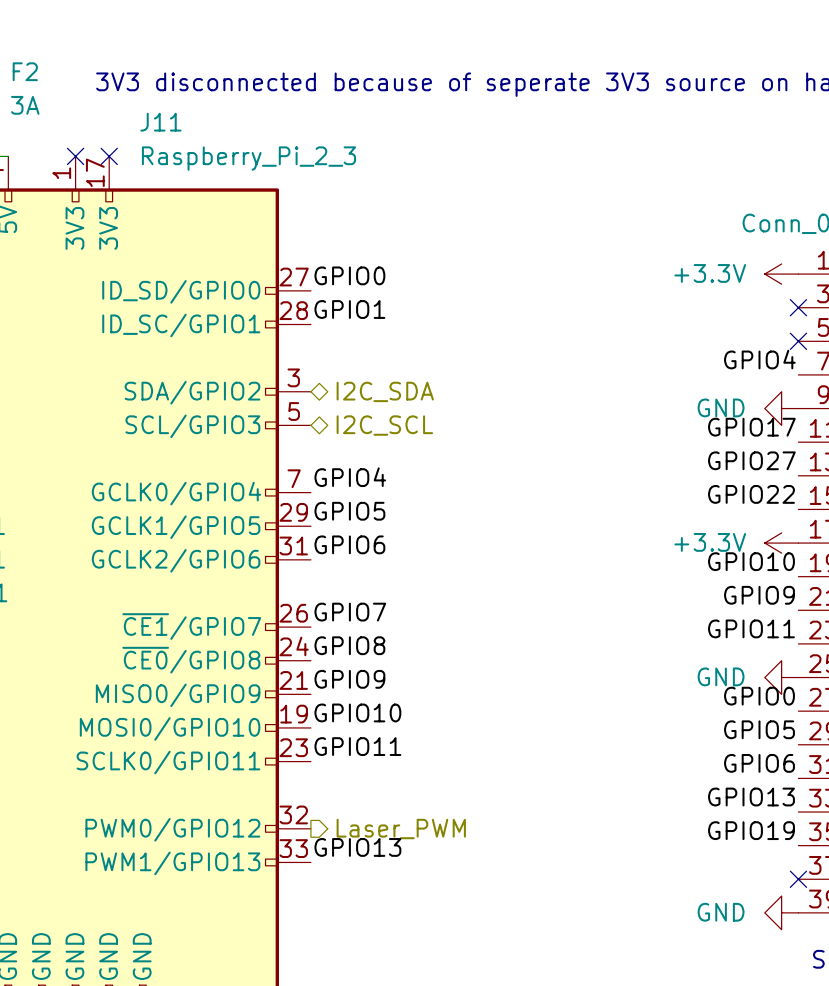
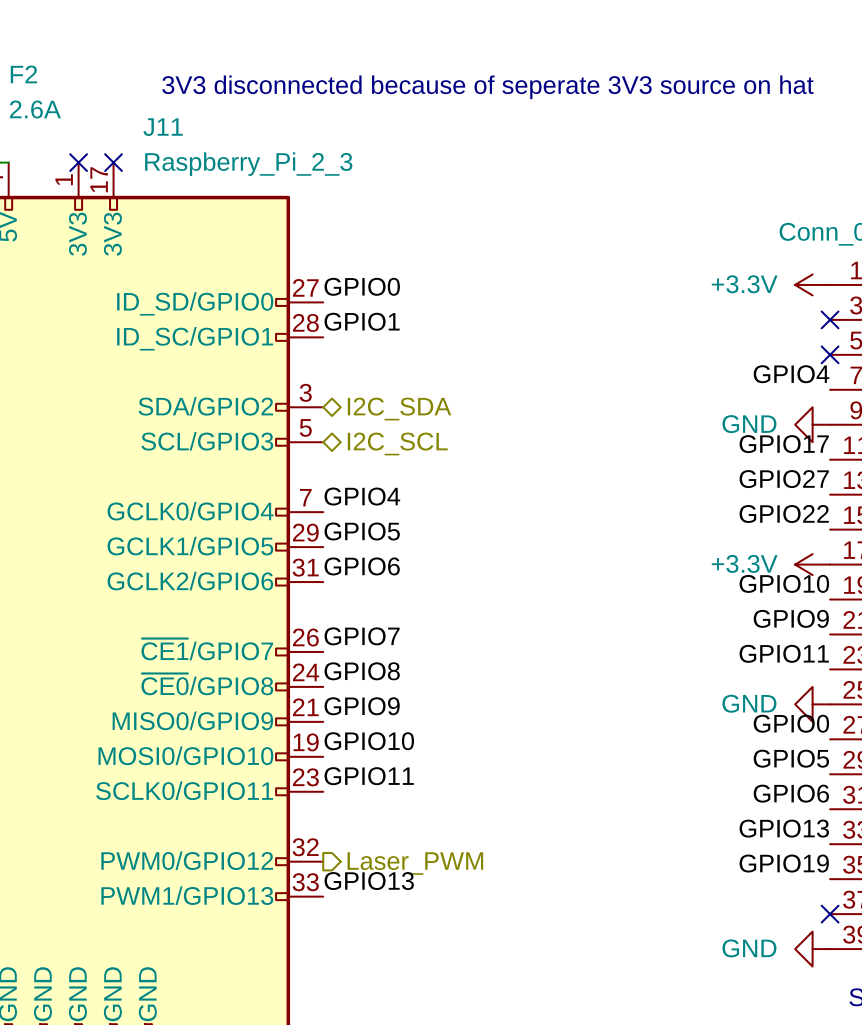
F2 value: 3A (25, 105) -> 2.6A (35, 109)

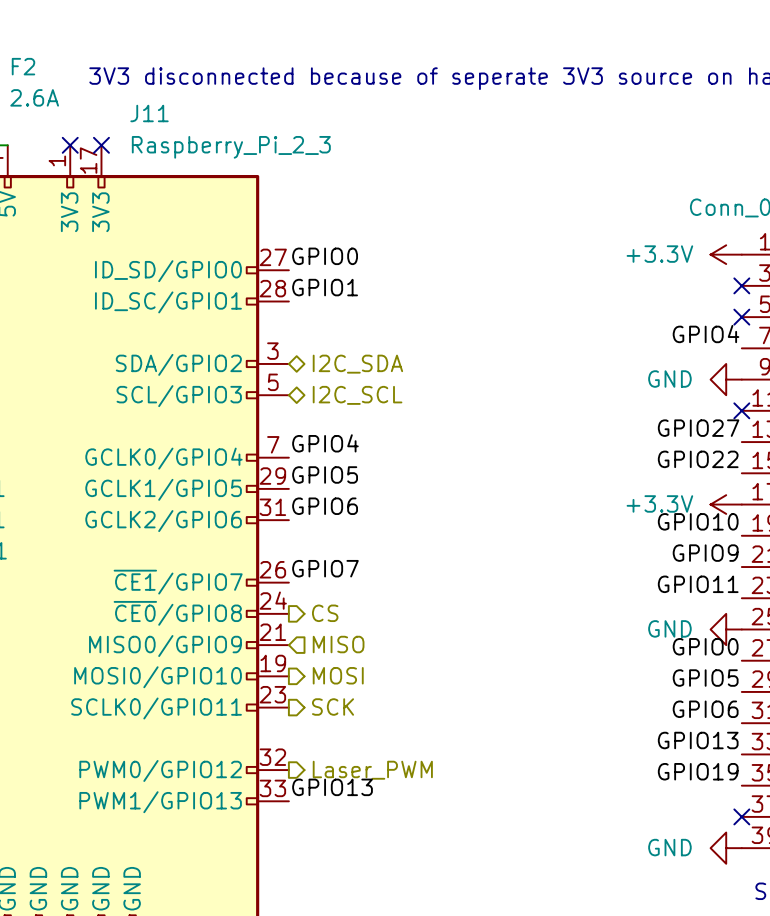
label: GPIO17 (784, 444) -> none
no-connect mark: none -> (741, 410)
label: GPIO8 (362, 671) -> none
hierarchical label: none -> CS (325, 613)
label: GPIO9 (362, 706) -> none
hierarchical label: none -> MISO (338, 644)
label: GPIO10 (369, 741) -> none
hierarchical label: none -> MOSI (338, 675)
label: GPIO11 (369, 776) -> none
hierarchical label: none -> SCK (333, 707)

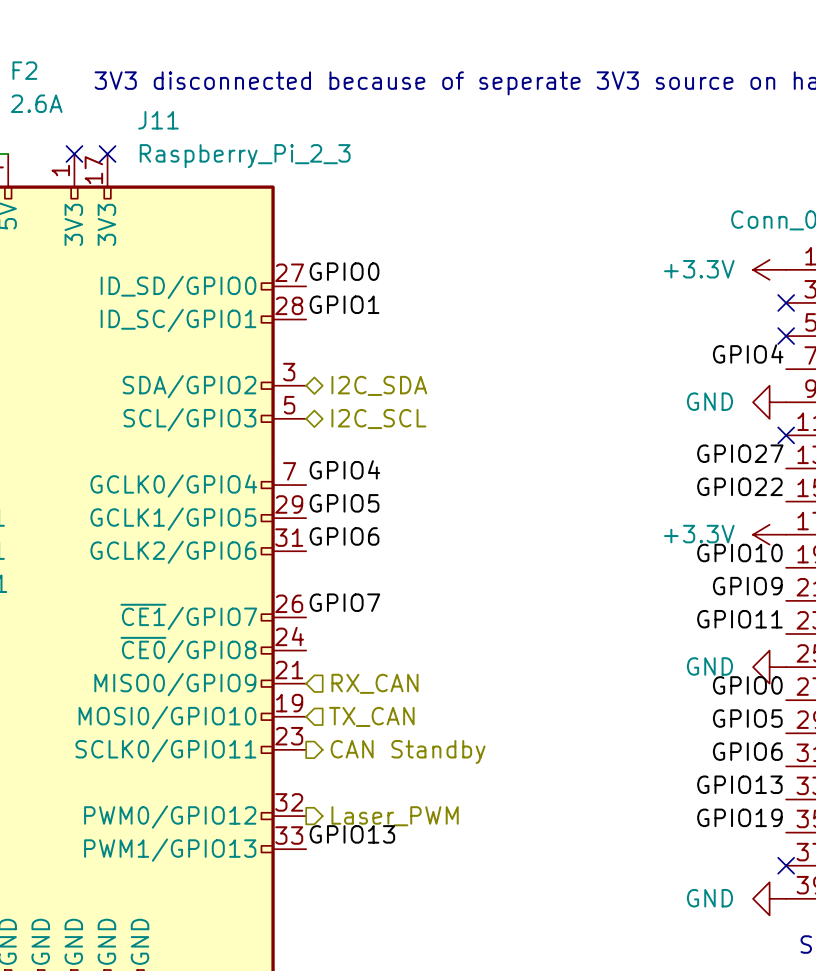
hierarchical label: CS (325, 613) -> none
hierarchical label: MISO (338, 644) -> RX_CAN (374, 683)
hierarchical label shape: output (338, 675) -> input (371, 716)
hierarchical label: MOSI (338, 675) -> TX_CAN (371, 716)
hierarchical label: SCK (333, 707) -> CAN Standby (408, 752)

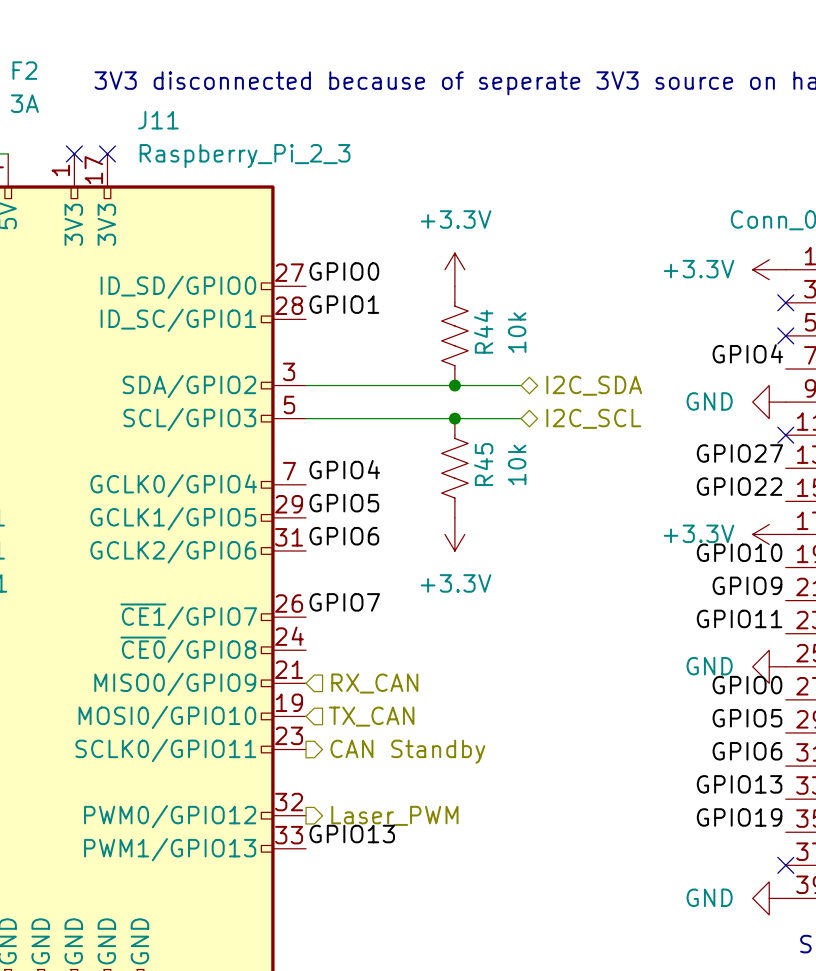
F2 value: 2.6A (36, 103) -> 3A (24, 103)
power symbol: none -> +3.3V (454, 269)
R44: none -> 10k (454, 335)
wire: none -> (306, 385) (521, 385)
hierarchical label position: I2C_SDA (379, 385) -> I2C_SDA (594, 385)
junction: none -> (454, 385)
wire: none -> (306, 418) (521, 418)
junction: none -> (454, 418)
hierarchical label position: I2C_SCL (378, 419) -> I2C_SCL (593, 418)
R45: none -> 10k (454, 468)
power symbol: none -> +3.3V (454, 534)

